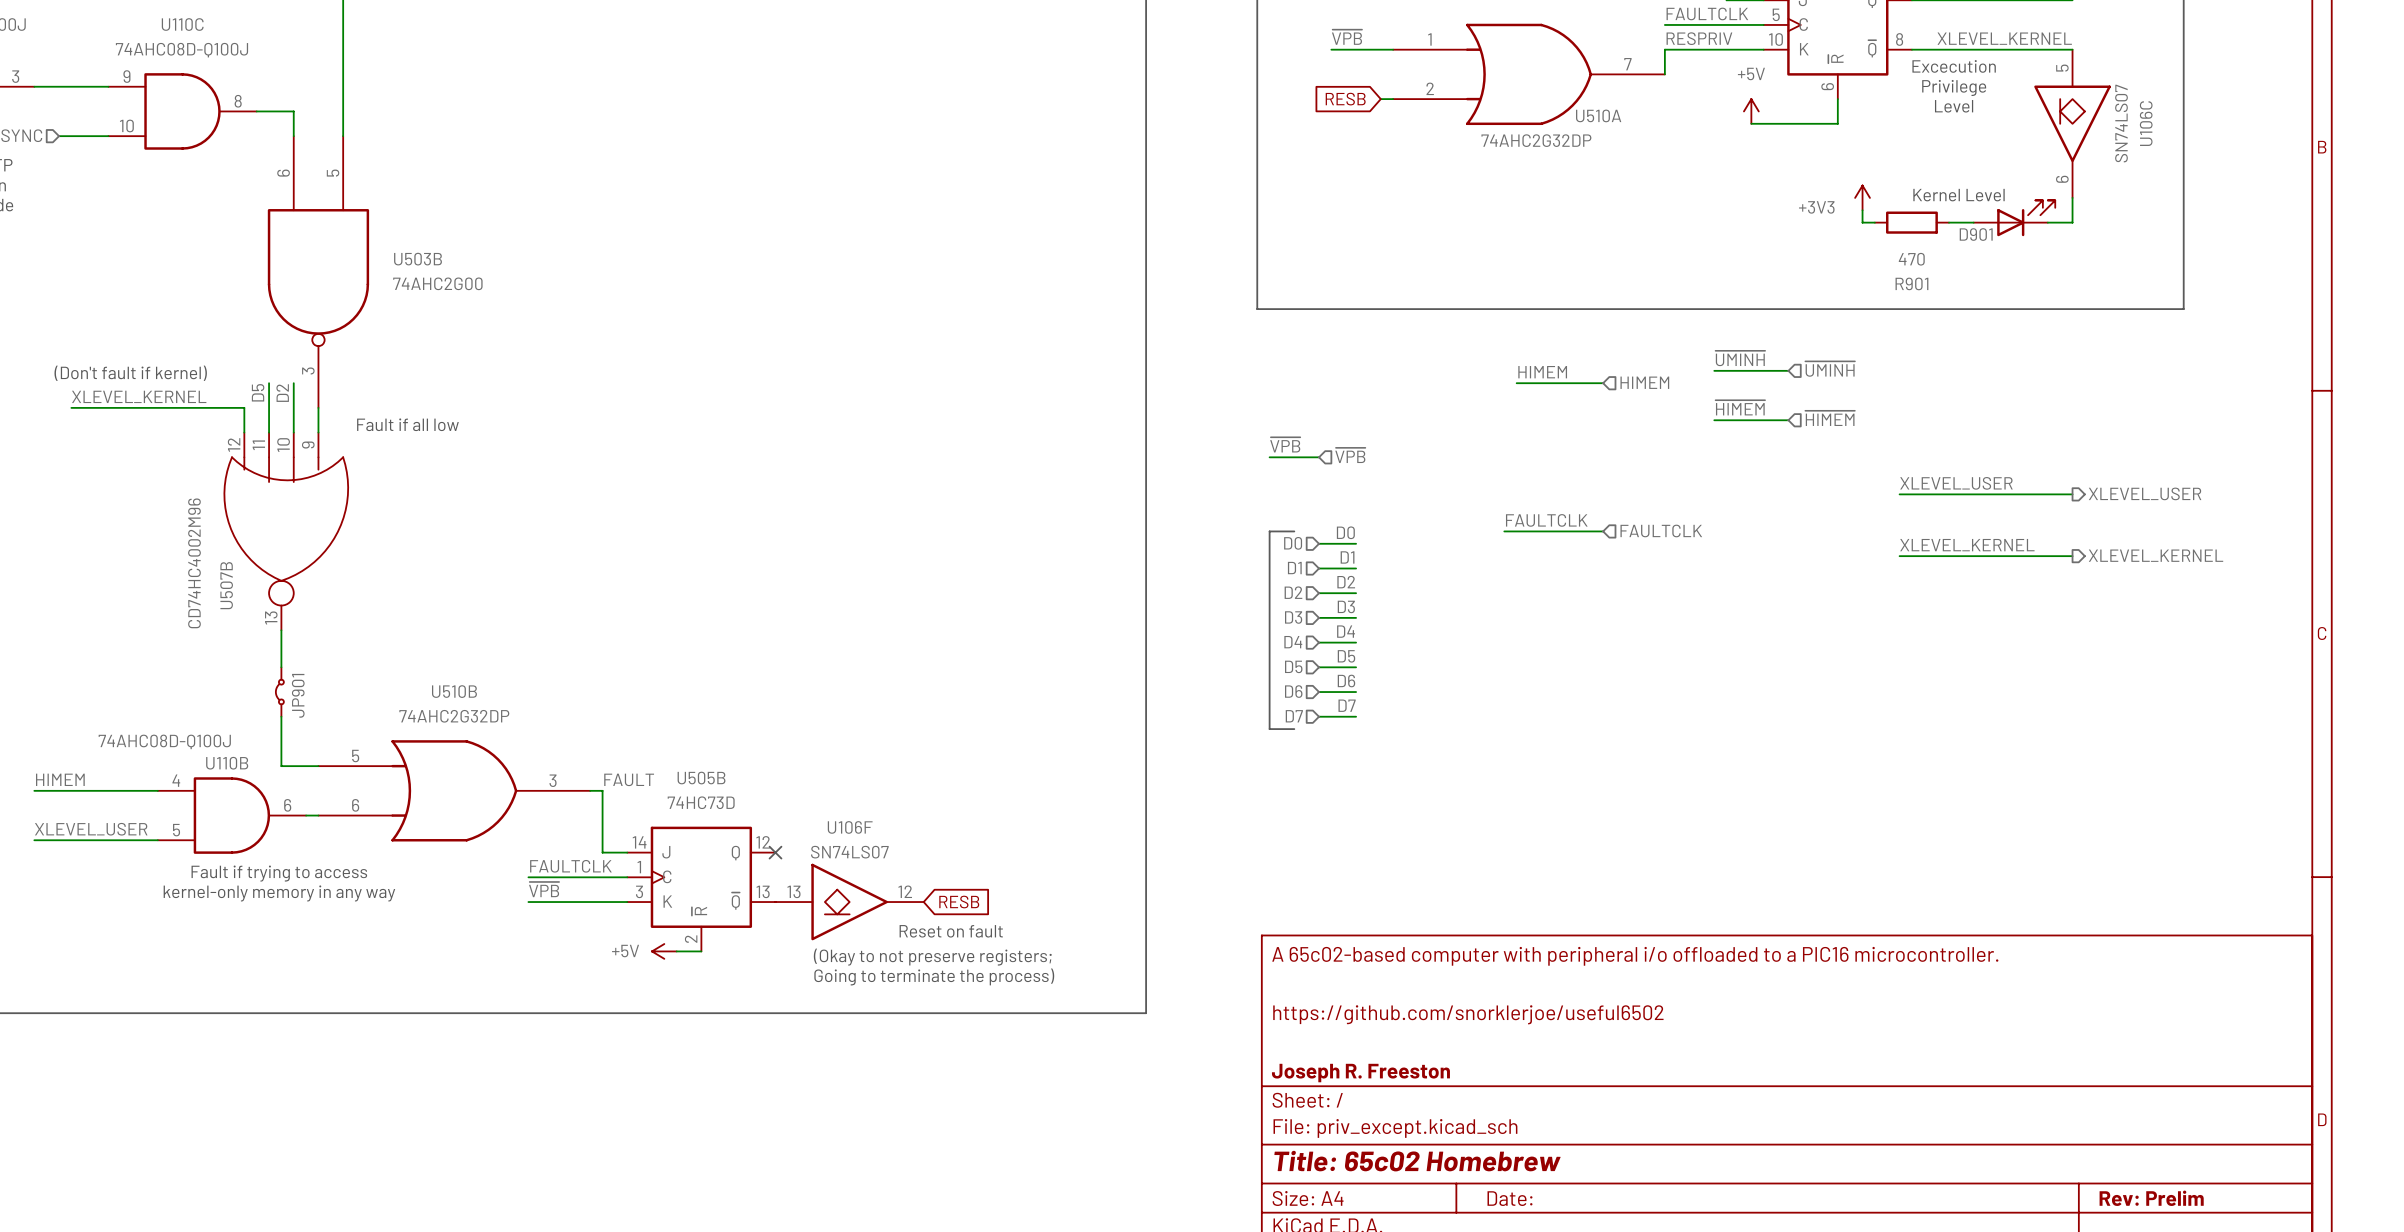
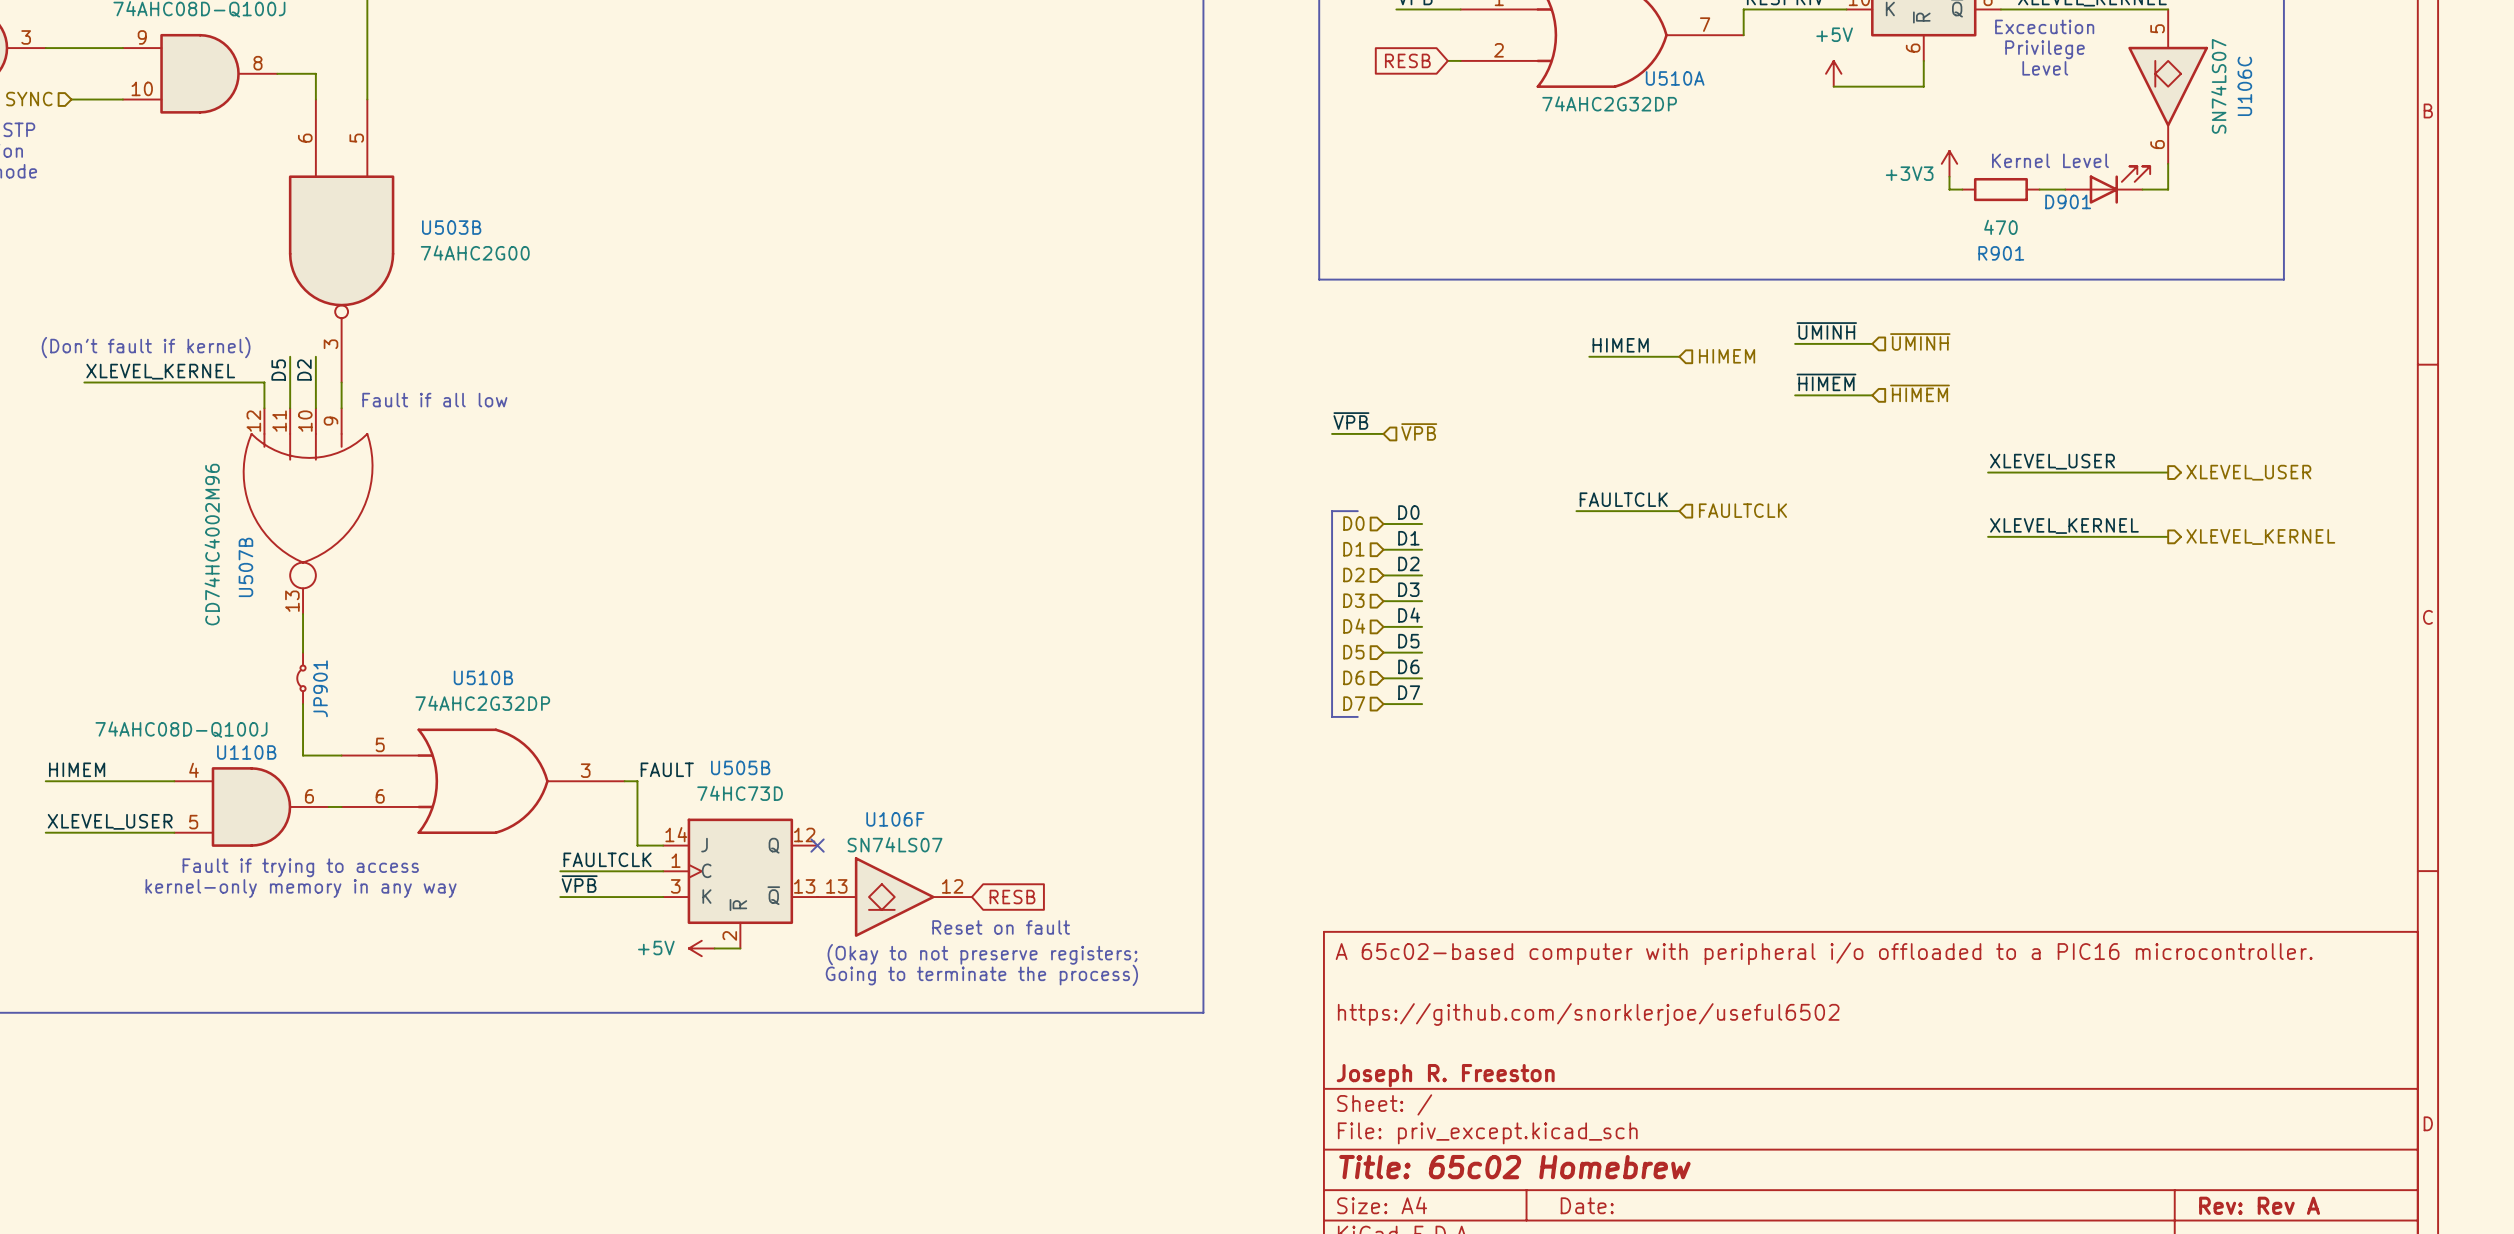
title block: Rev: Prelim (2151, 1198) -> Rev: Rev A (2259, 1205)

